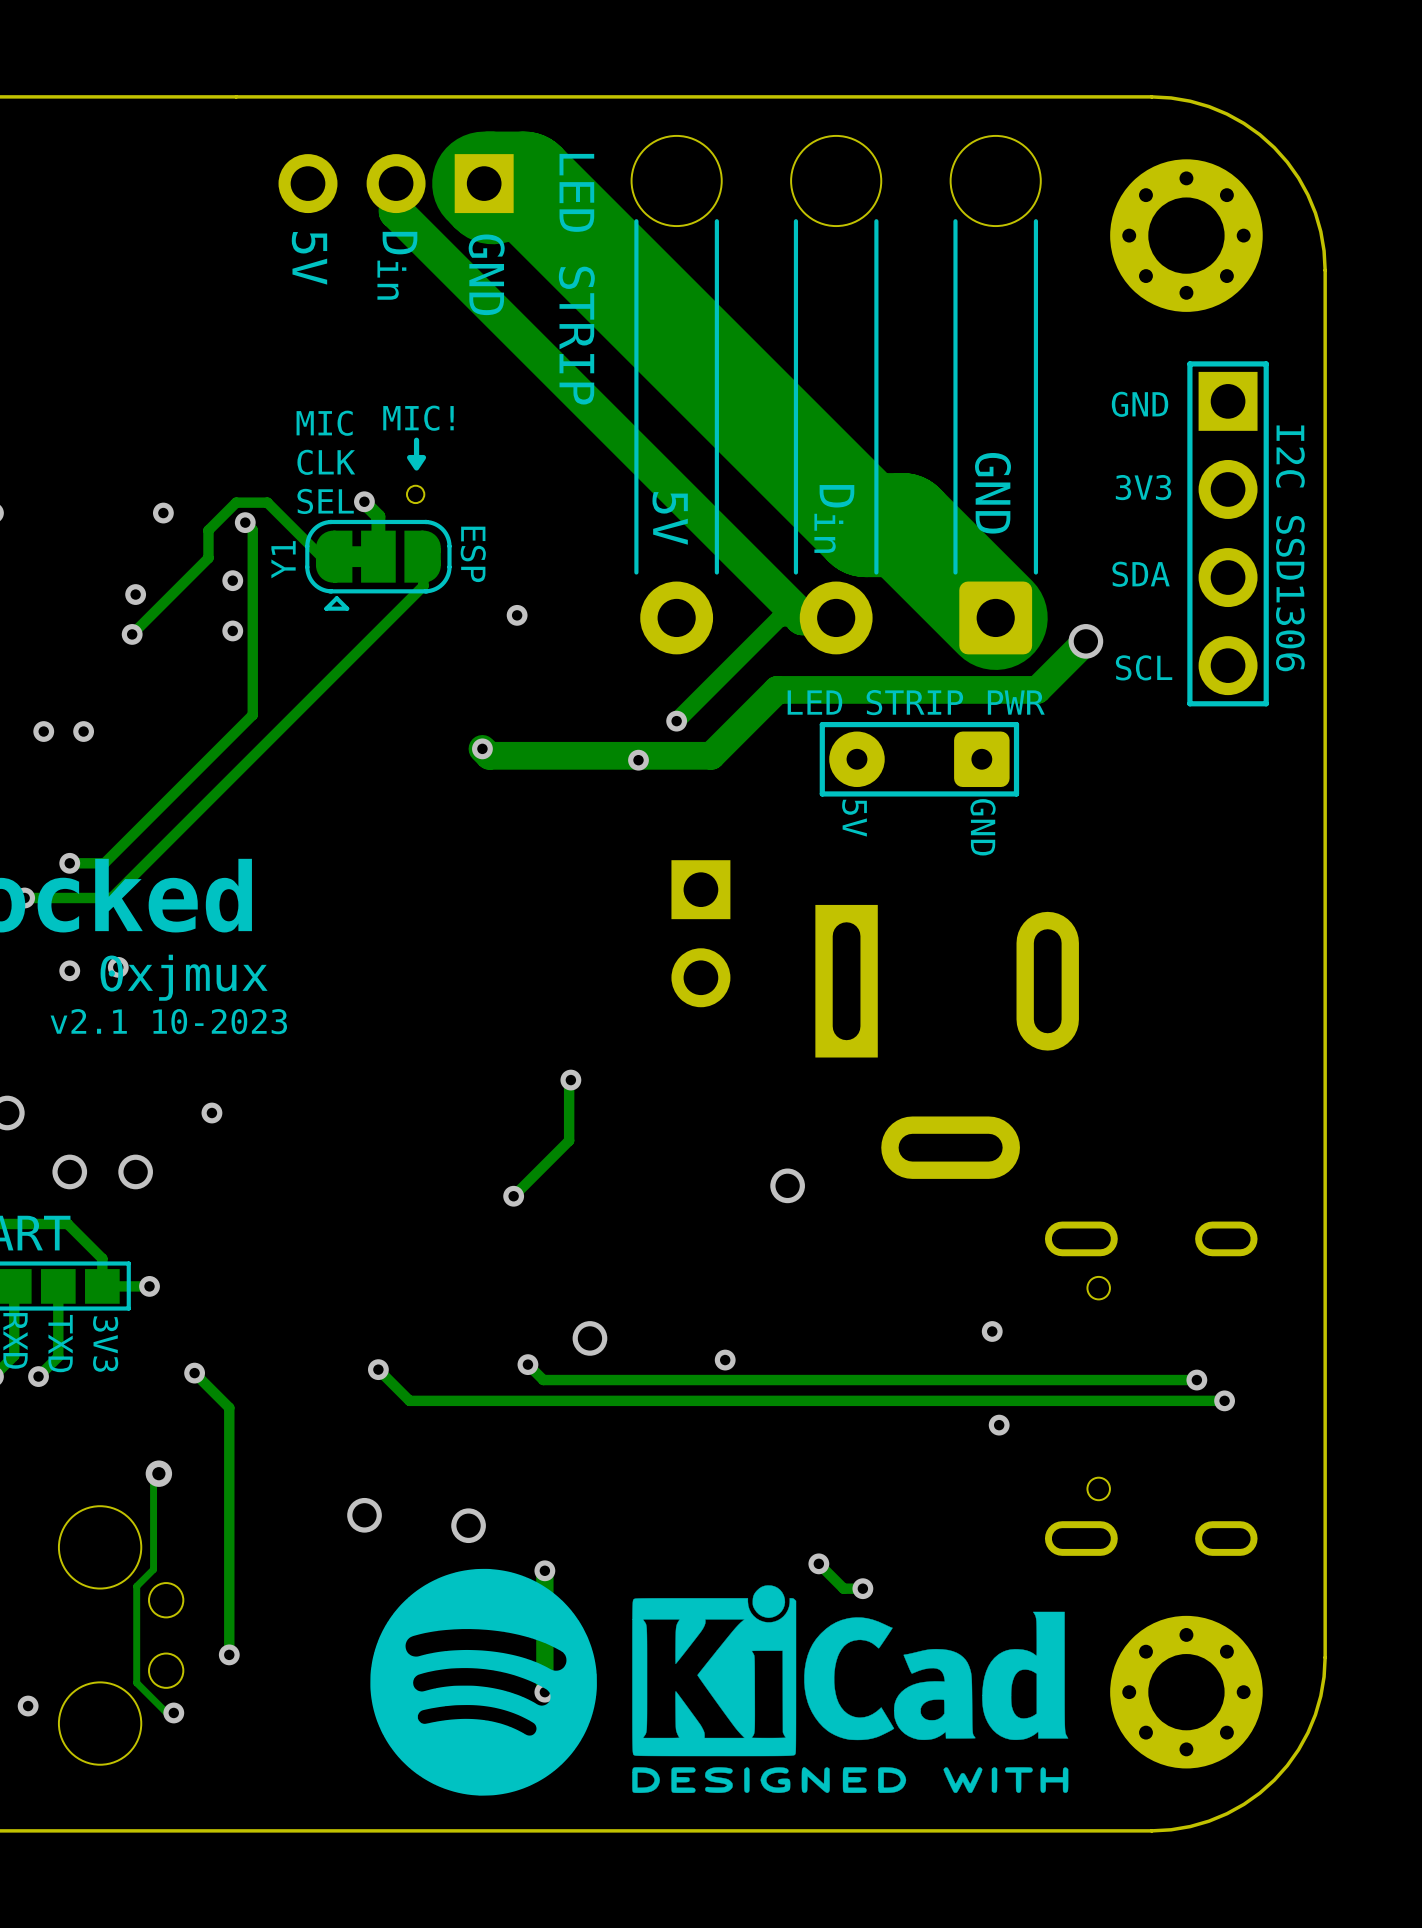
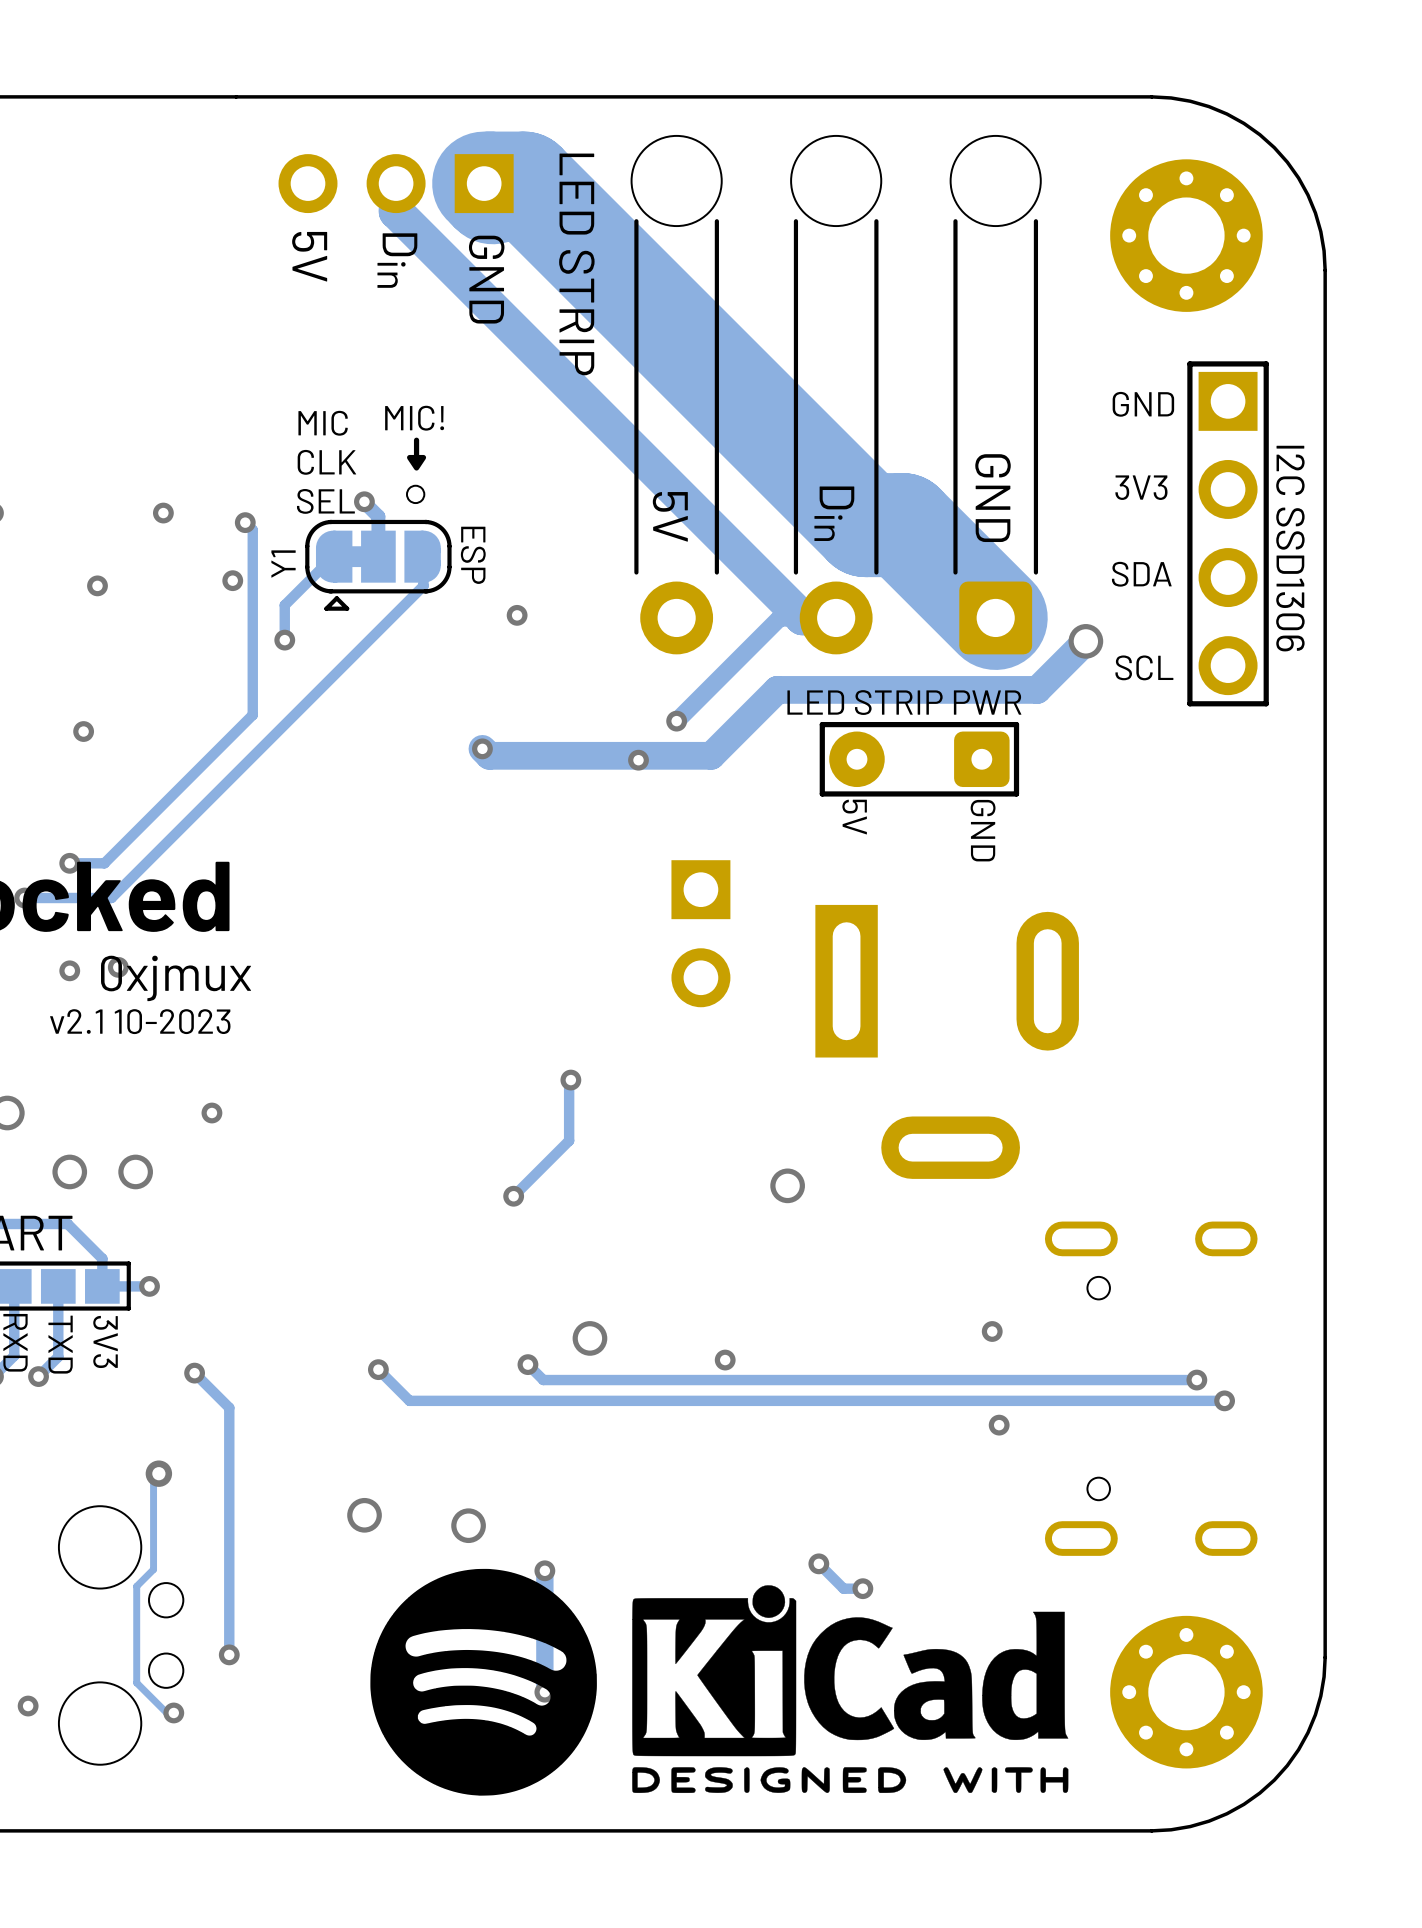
track: none -> (333, 556) (284, 605) (284, 640)
track: (333, 568) (267, 502) (236, 502) (208, 530) (208, 558) (132, 634) -> none
via: none -> (97, 585)
via: (135, 594) -> none
via position: (232, 630) -> (284, 640)
via: (132, 634) -> none
via: (43, 731) -> none

